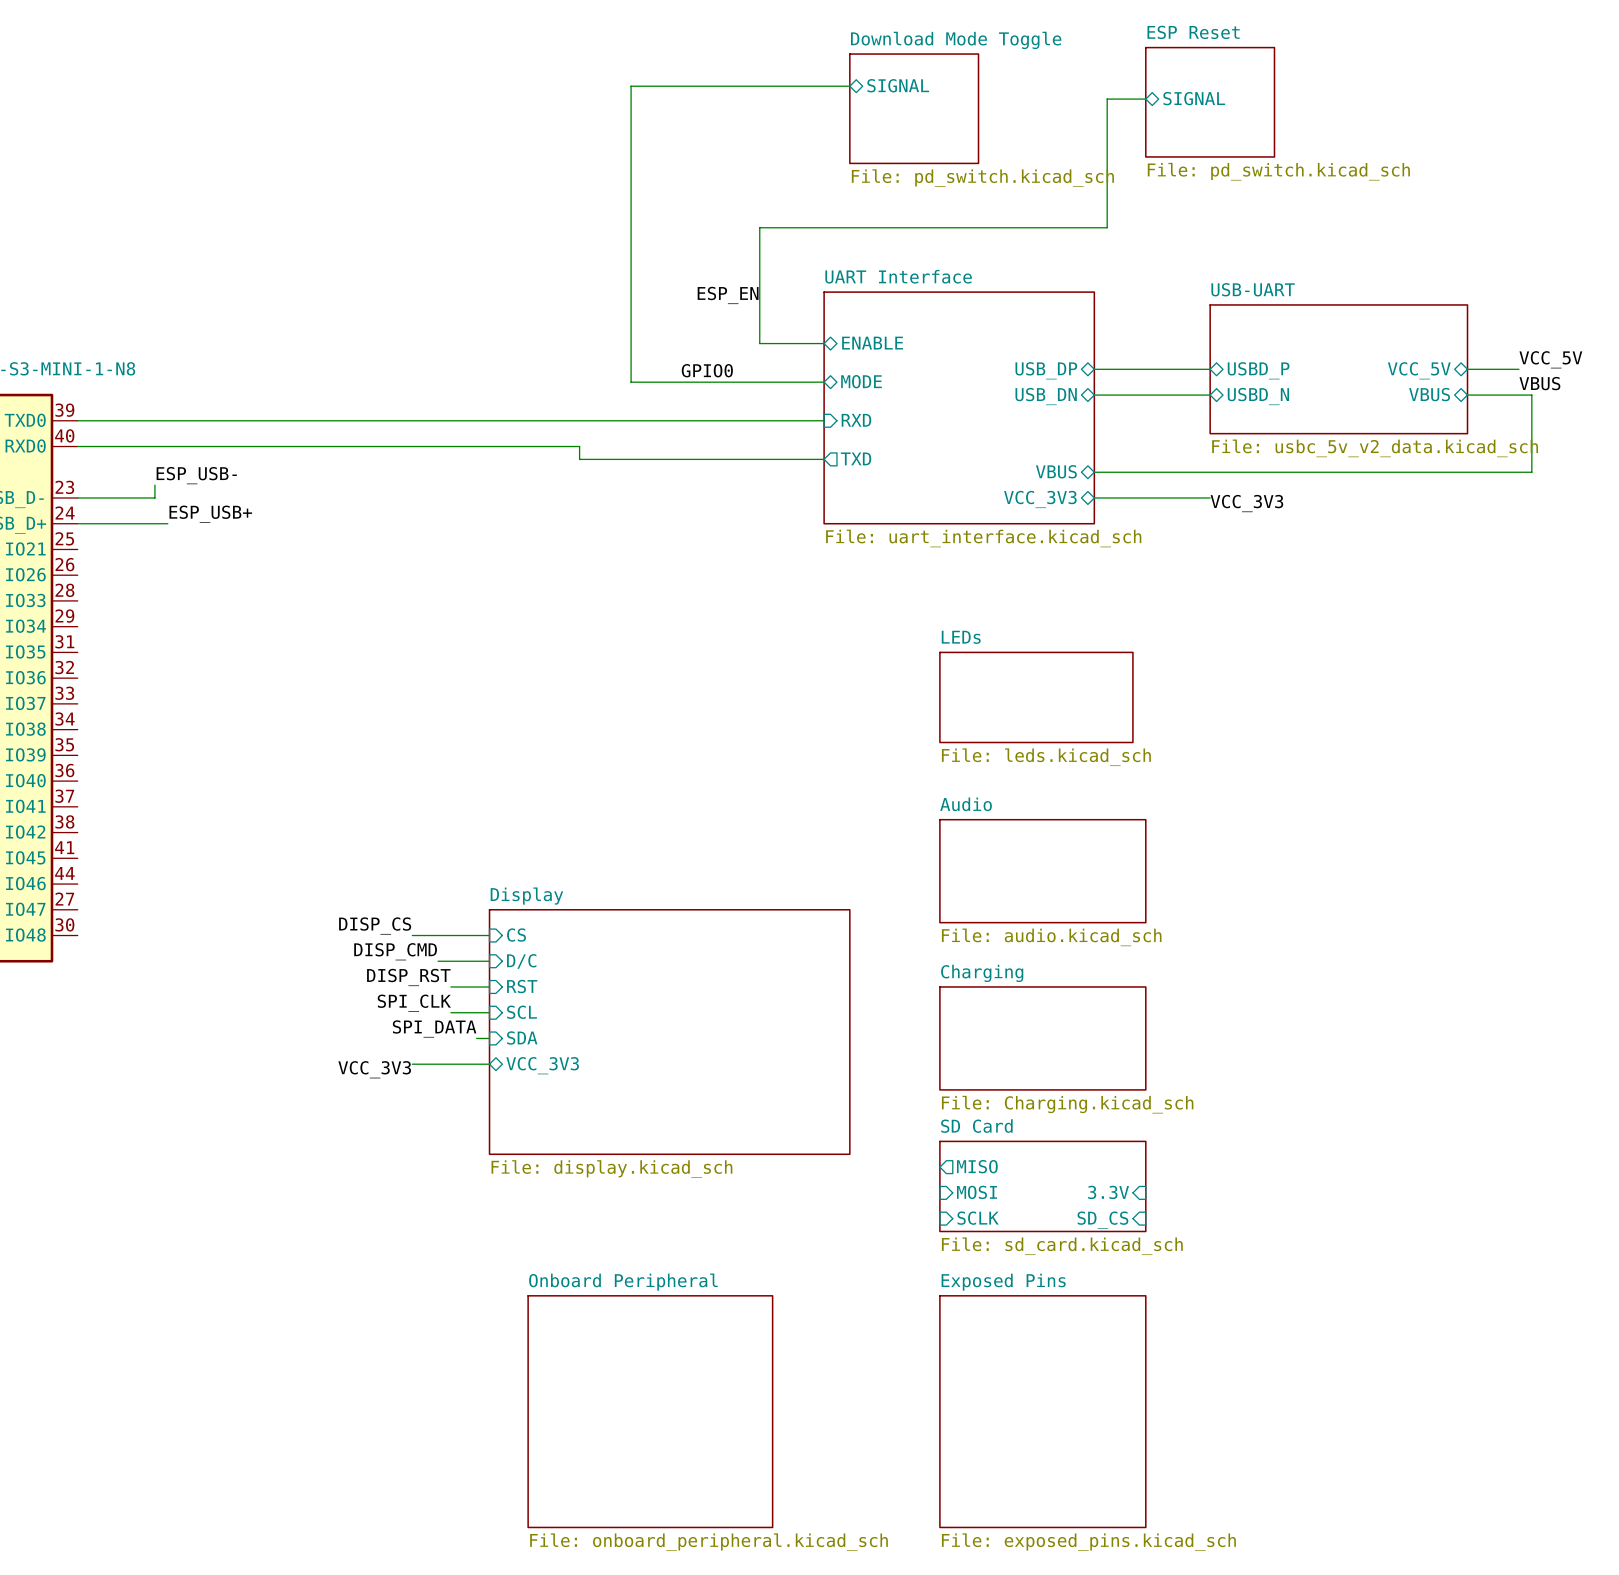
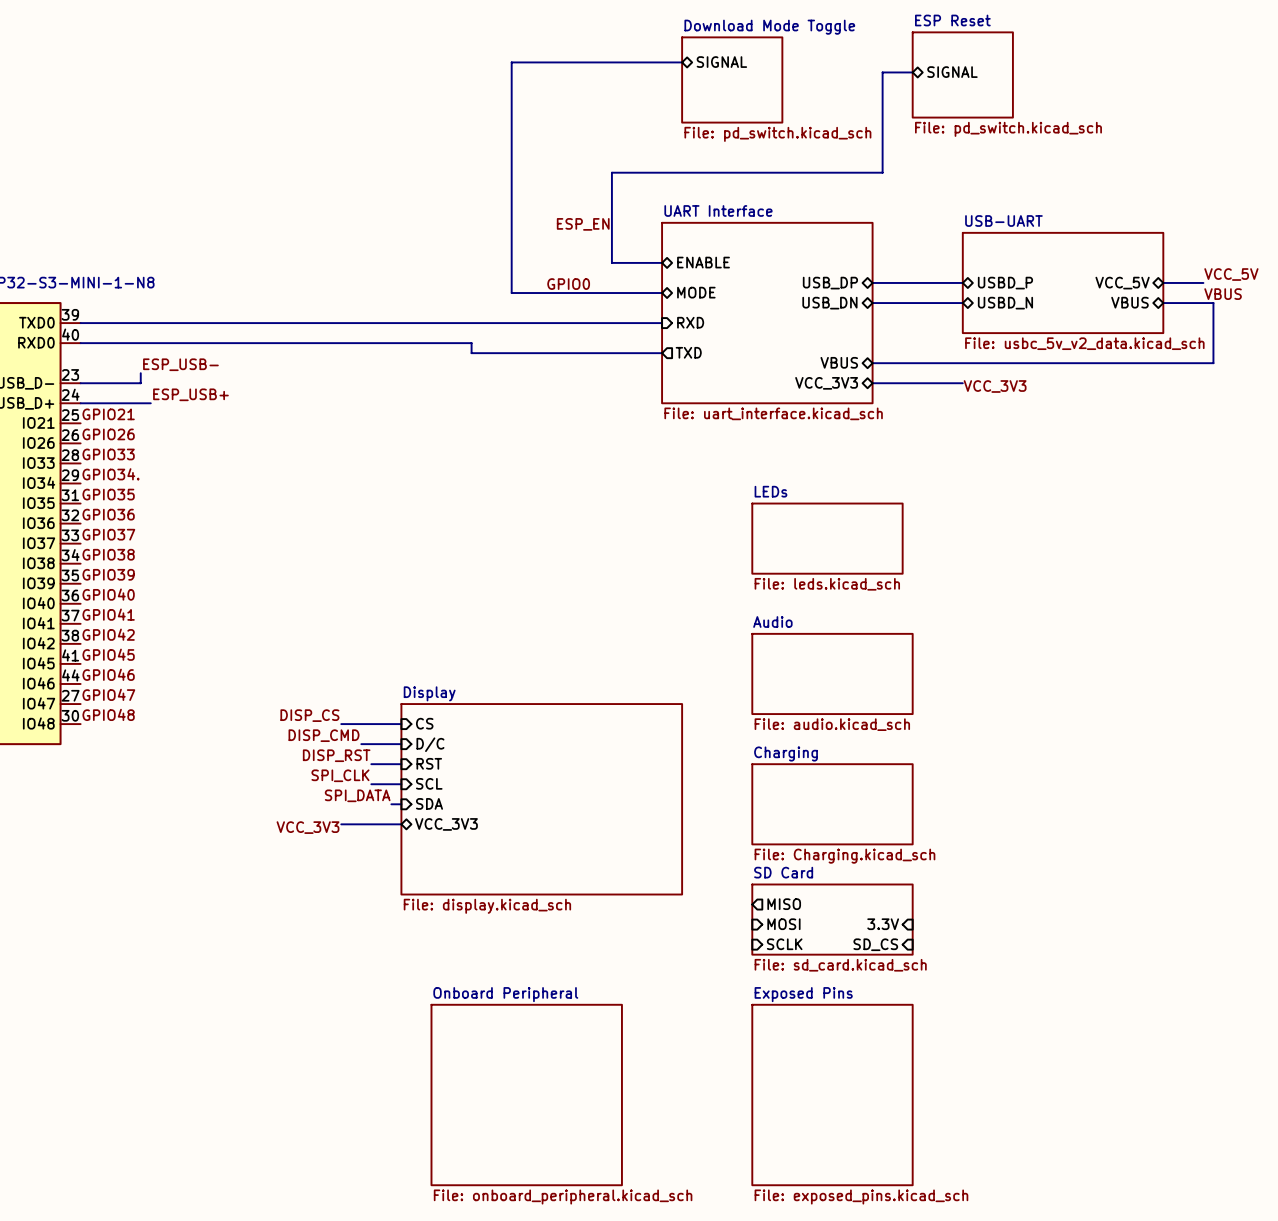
label: none -> GPIO21 (108, 414)
label: none -> GPIO26 (108, 434)
label: none -> GPIO33 (108, 454)
label: none -> GPIO34. (111, 474)
label: none -> GPIO35 (108, 494)
label: none -> GPIO36 (108, 514)
label: none -> GPIO37 (108, 534)
label: none -> GPIO38 (108, 554)
label: none -> GPIO39 (108, 574)
label: none -> GPIO40 (108, 594)
label: none -> GPIO41 (108, 614)
label: none -> GPIO42 (108, 634)
label: none -> GPIO45 (108, 654)
label: none -> GPIO46 (108, 674)
label: none -> GPIO47 (108, 694)
label: none -> GPIO48 (108, 714)

